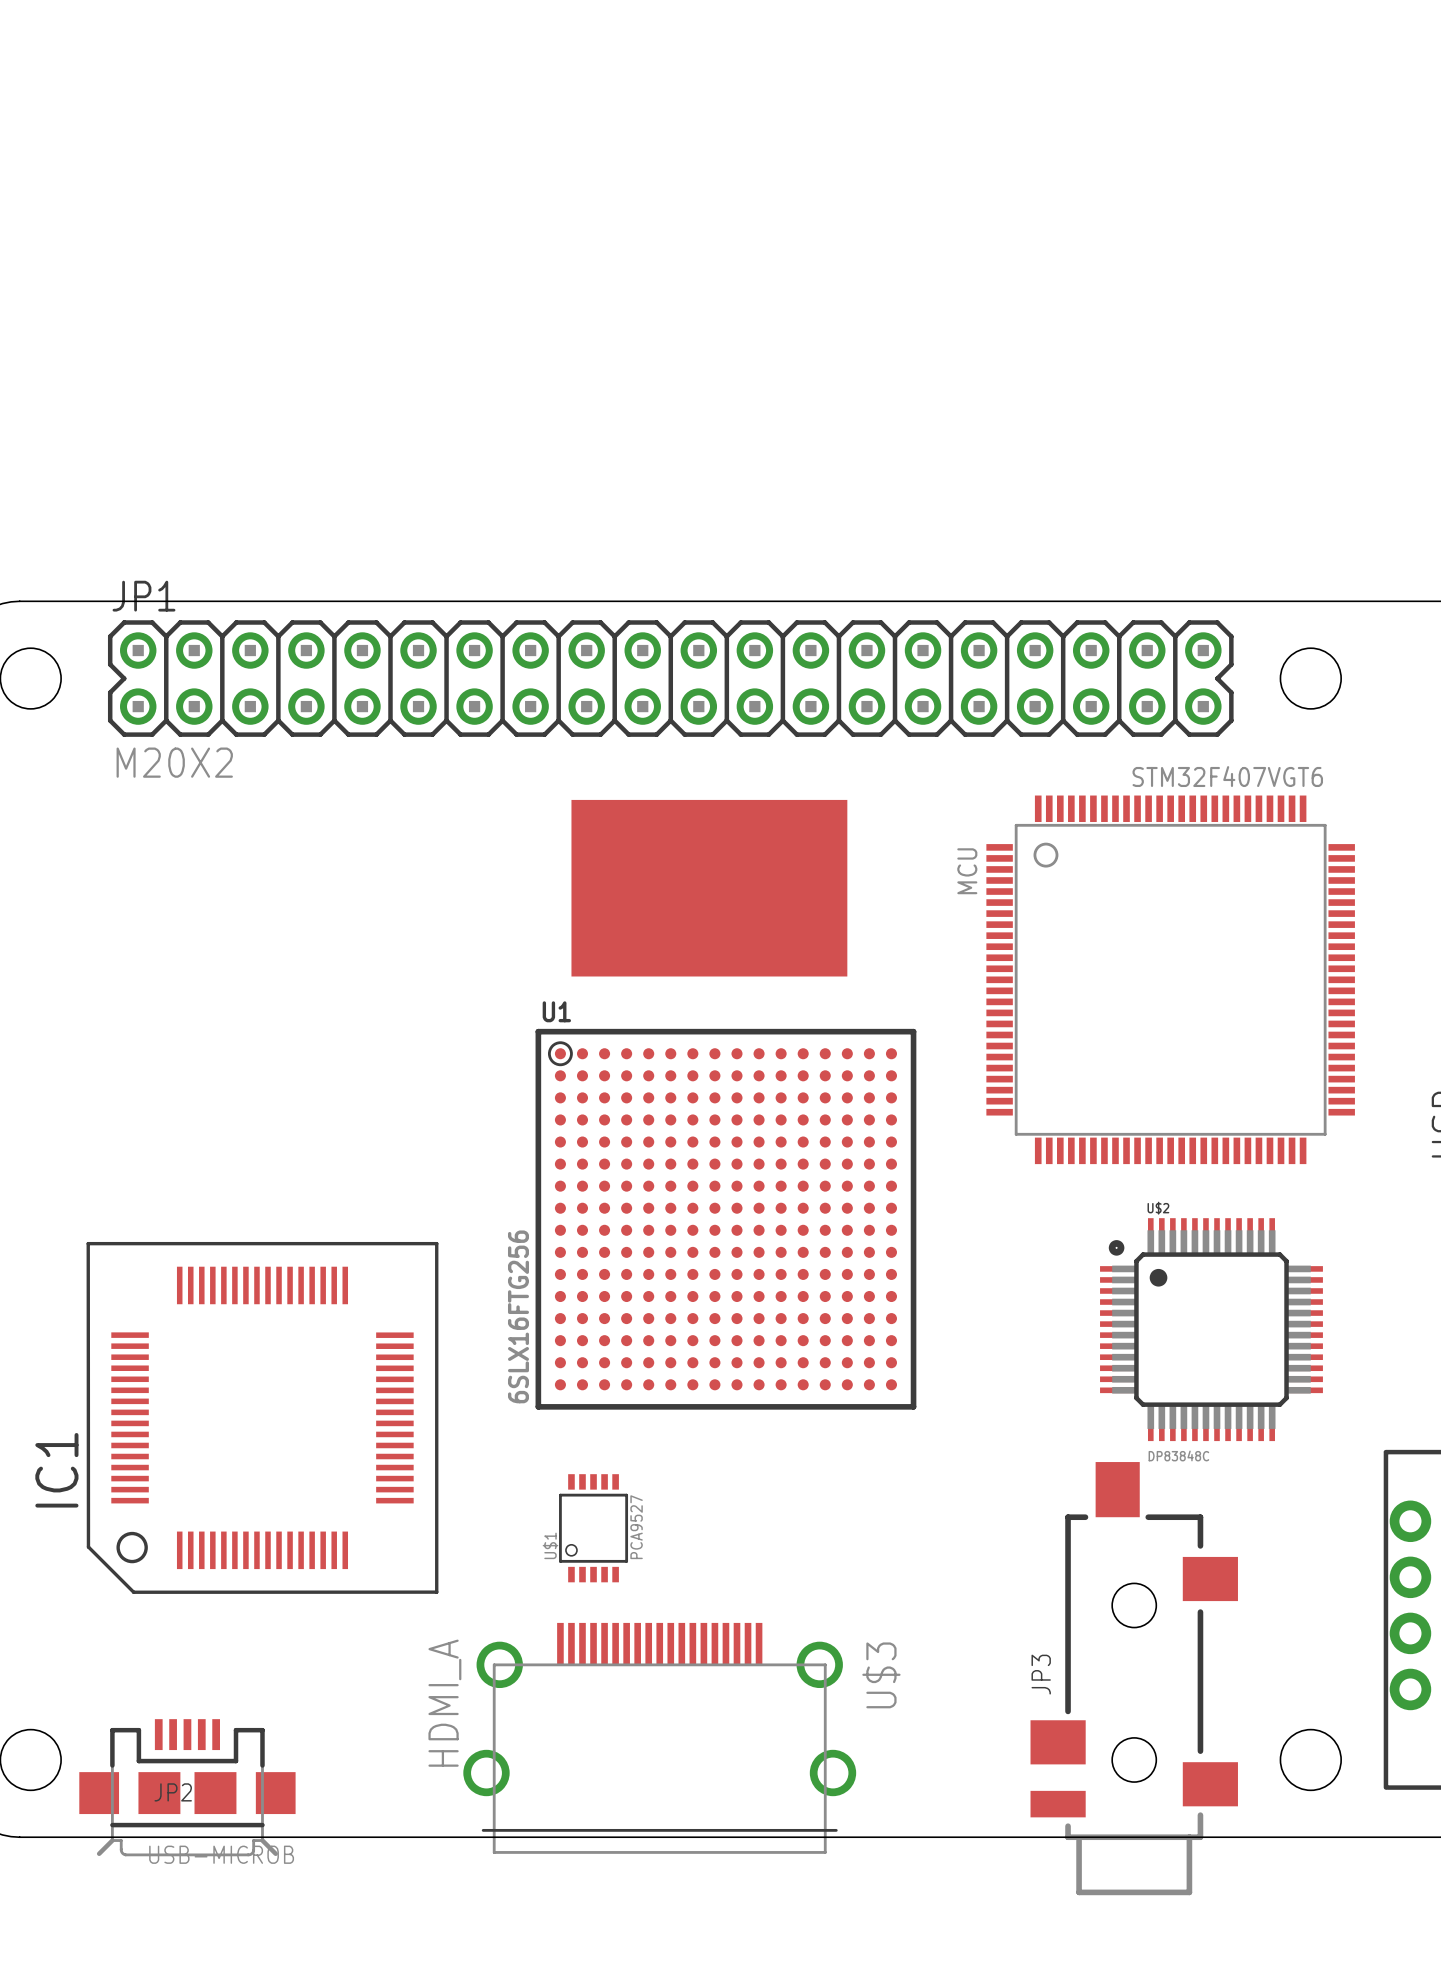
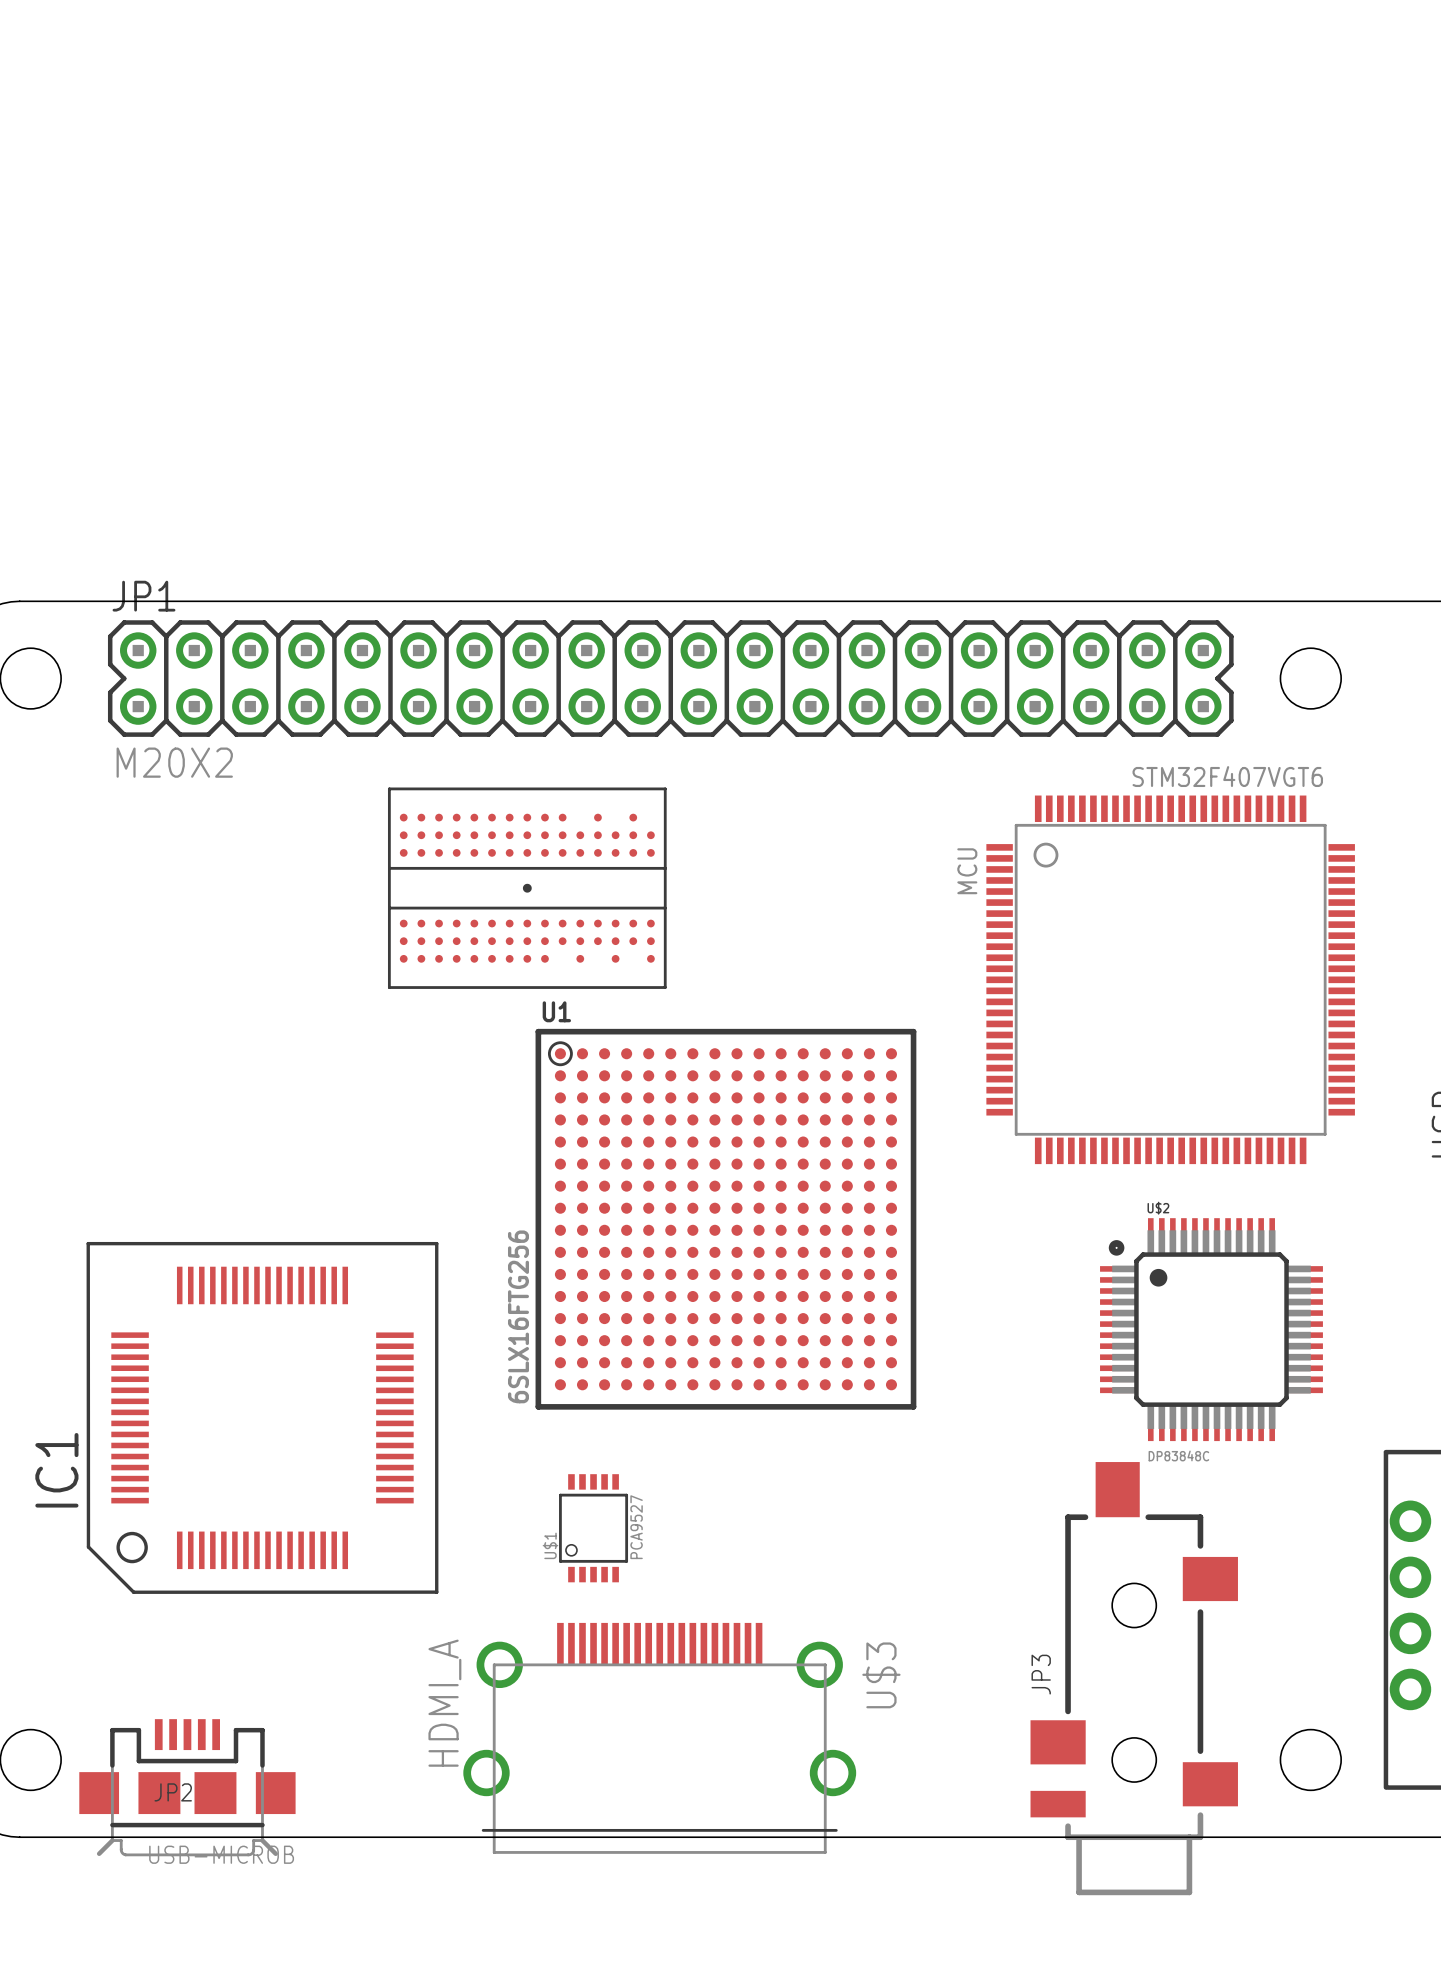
drawing: [571, 799, 848, 977] -> none
part: none -> (527, 888)

